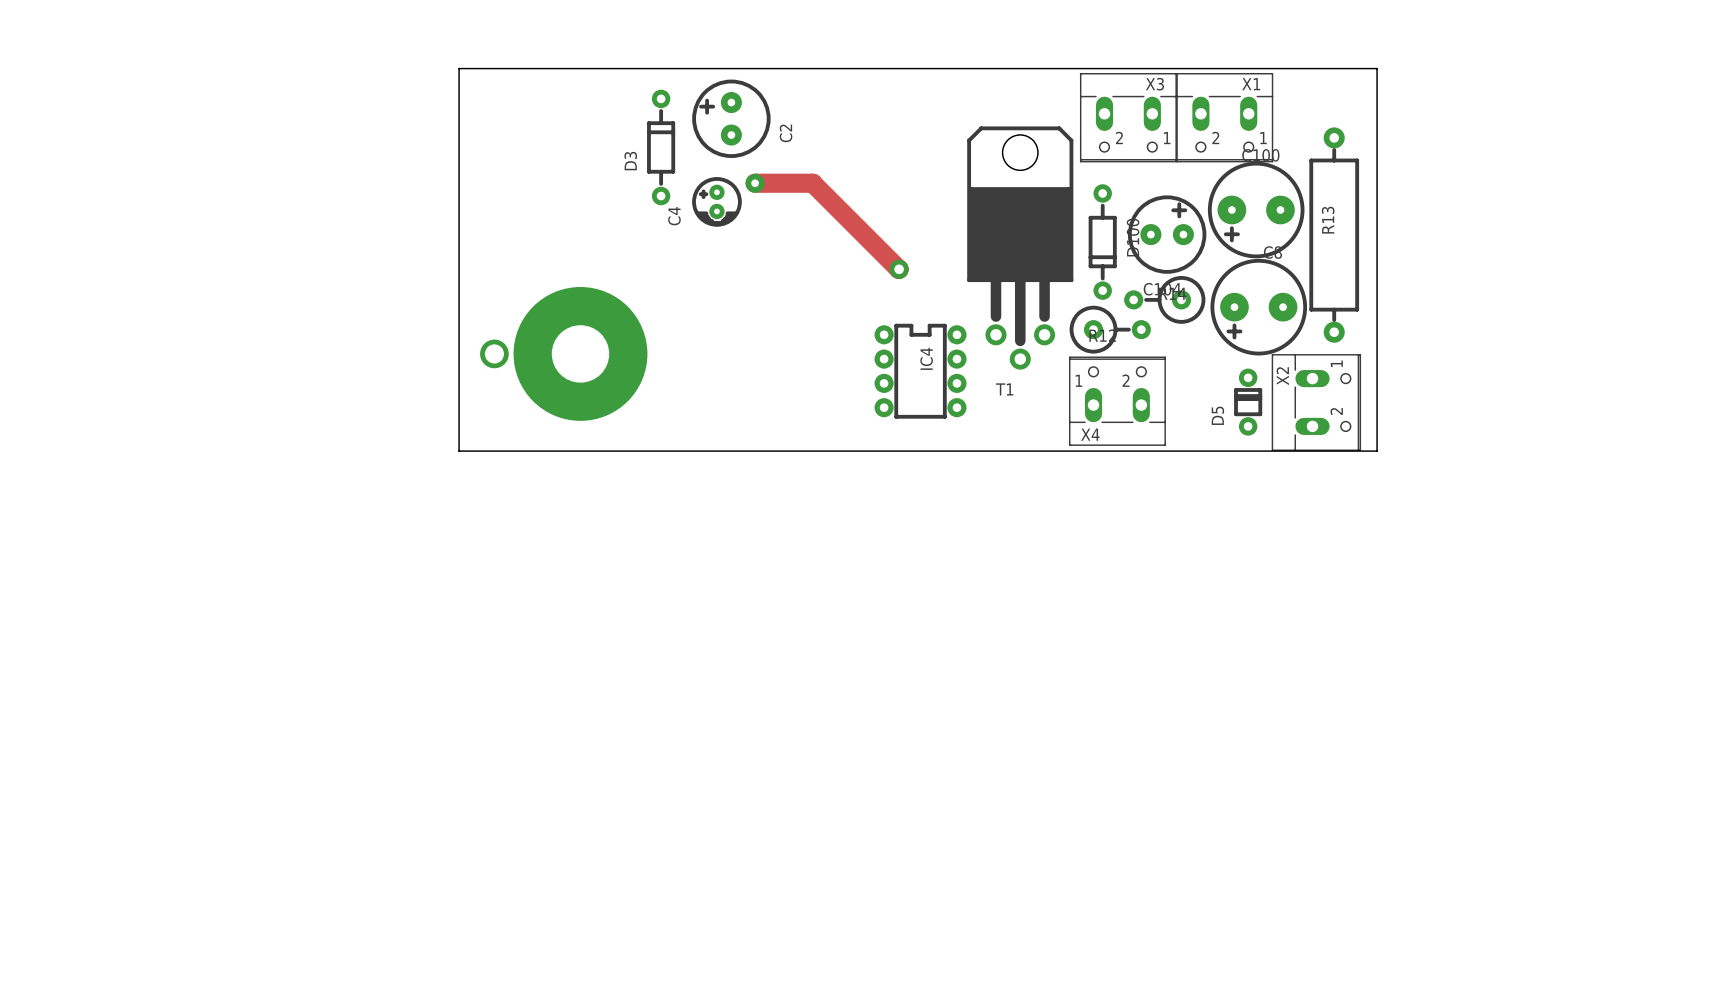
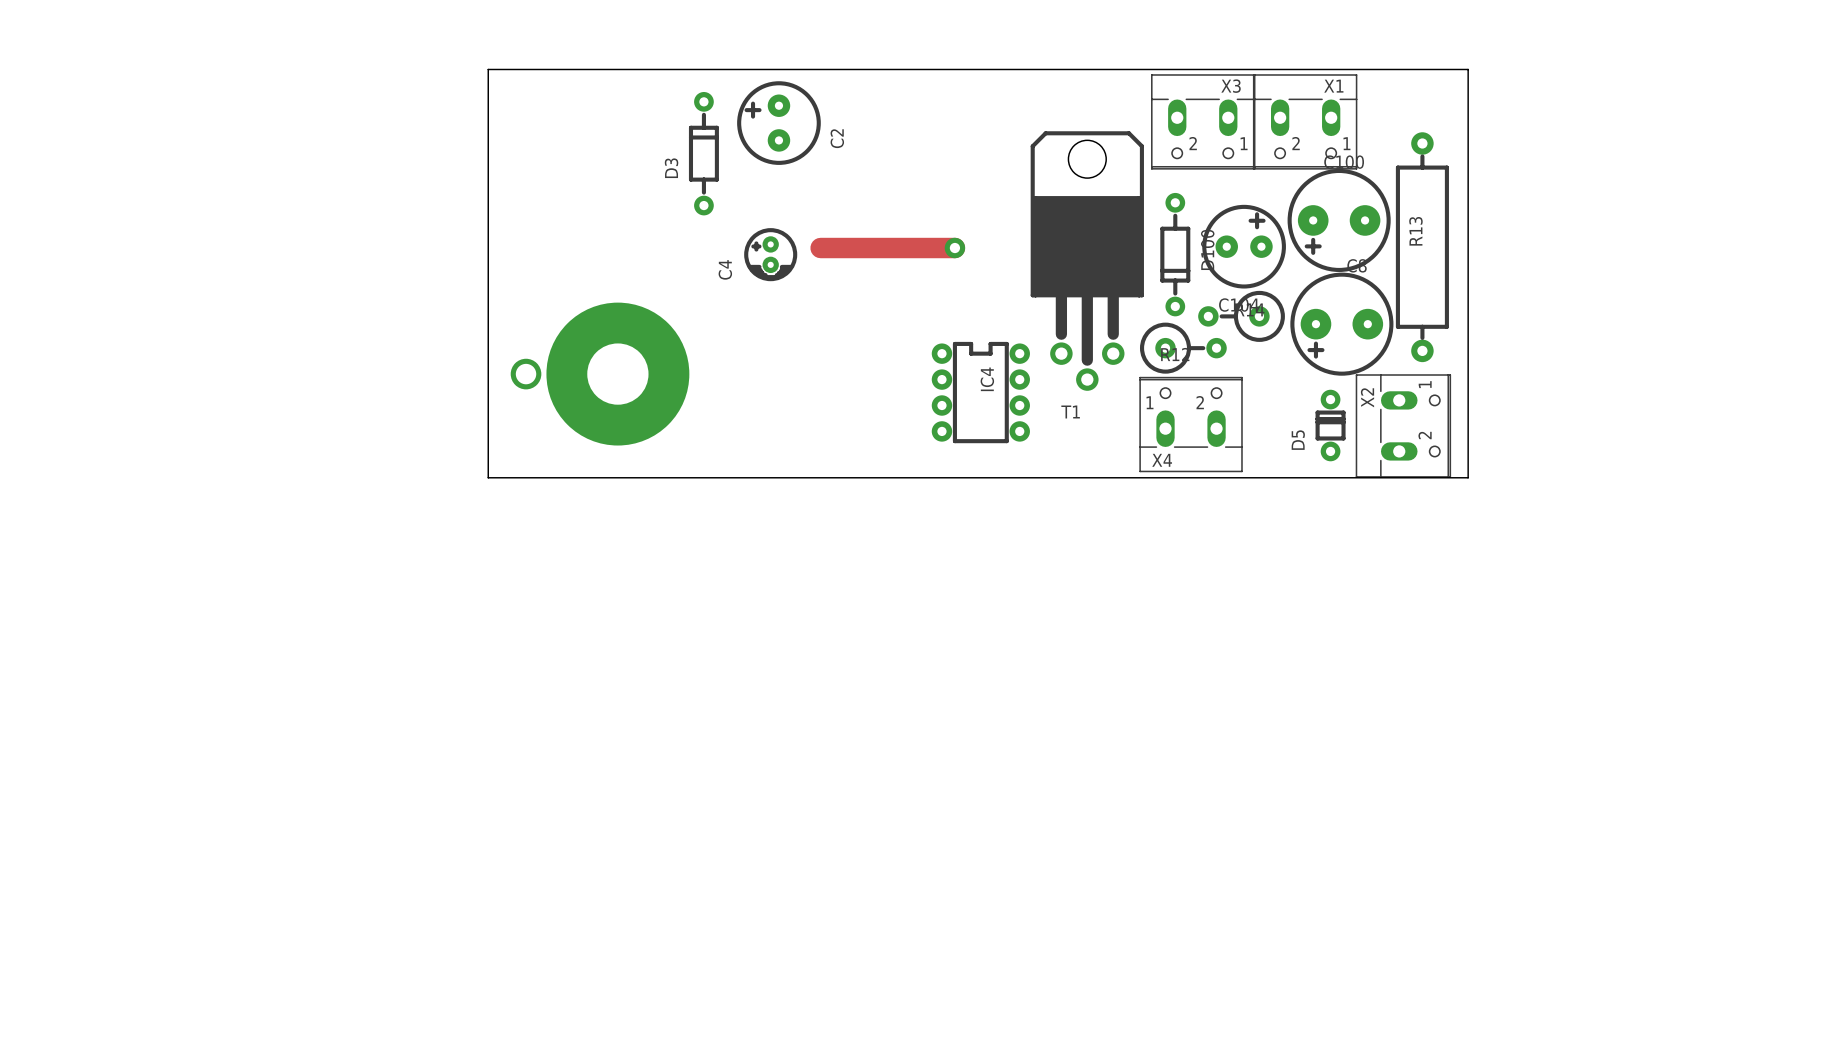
track: (755, 183) (812, 183) (899, 269) -> none
via: (755, 183) -> none
C4 position: (716, 201) -> (770, 254)
track: none -> (820, 248) (954, 248)
via position: (899, 269) -> (954, 248)

